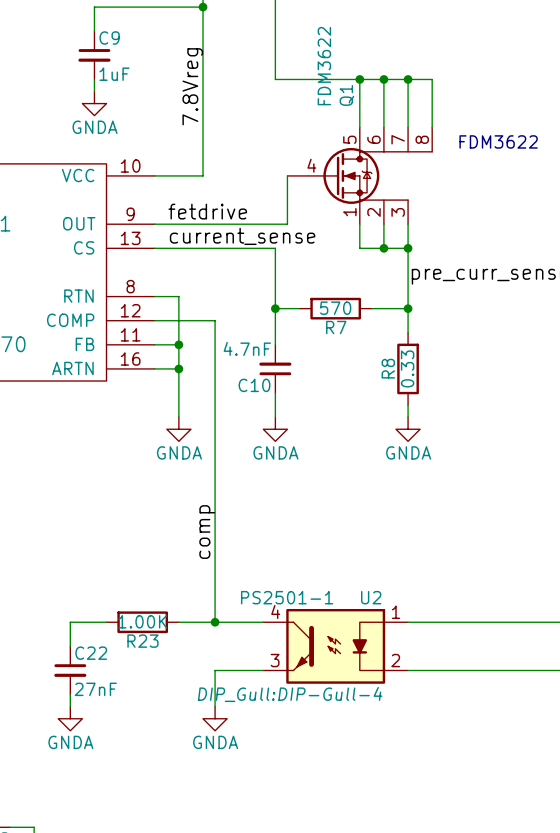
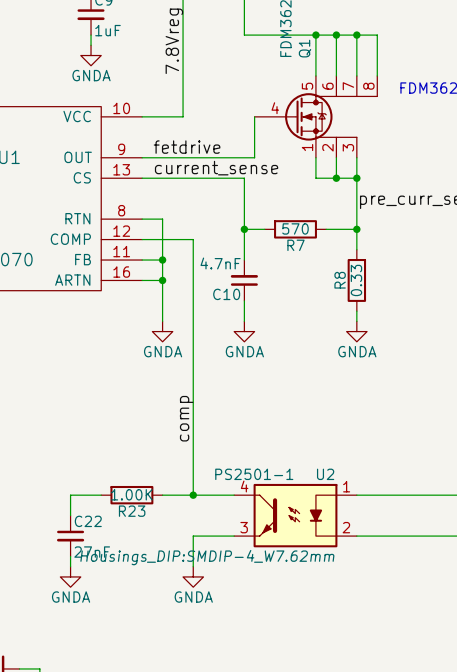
U2 text: DIP_Gull:DIP-Gull-4 (290, 694) -> Housings_DIP:SMDIP-4_W7.62mm (207, 557)

